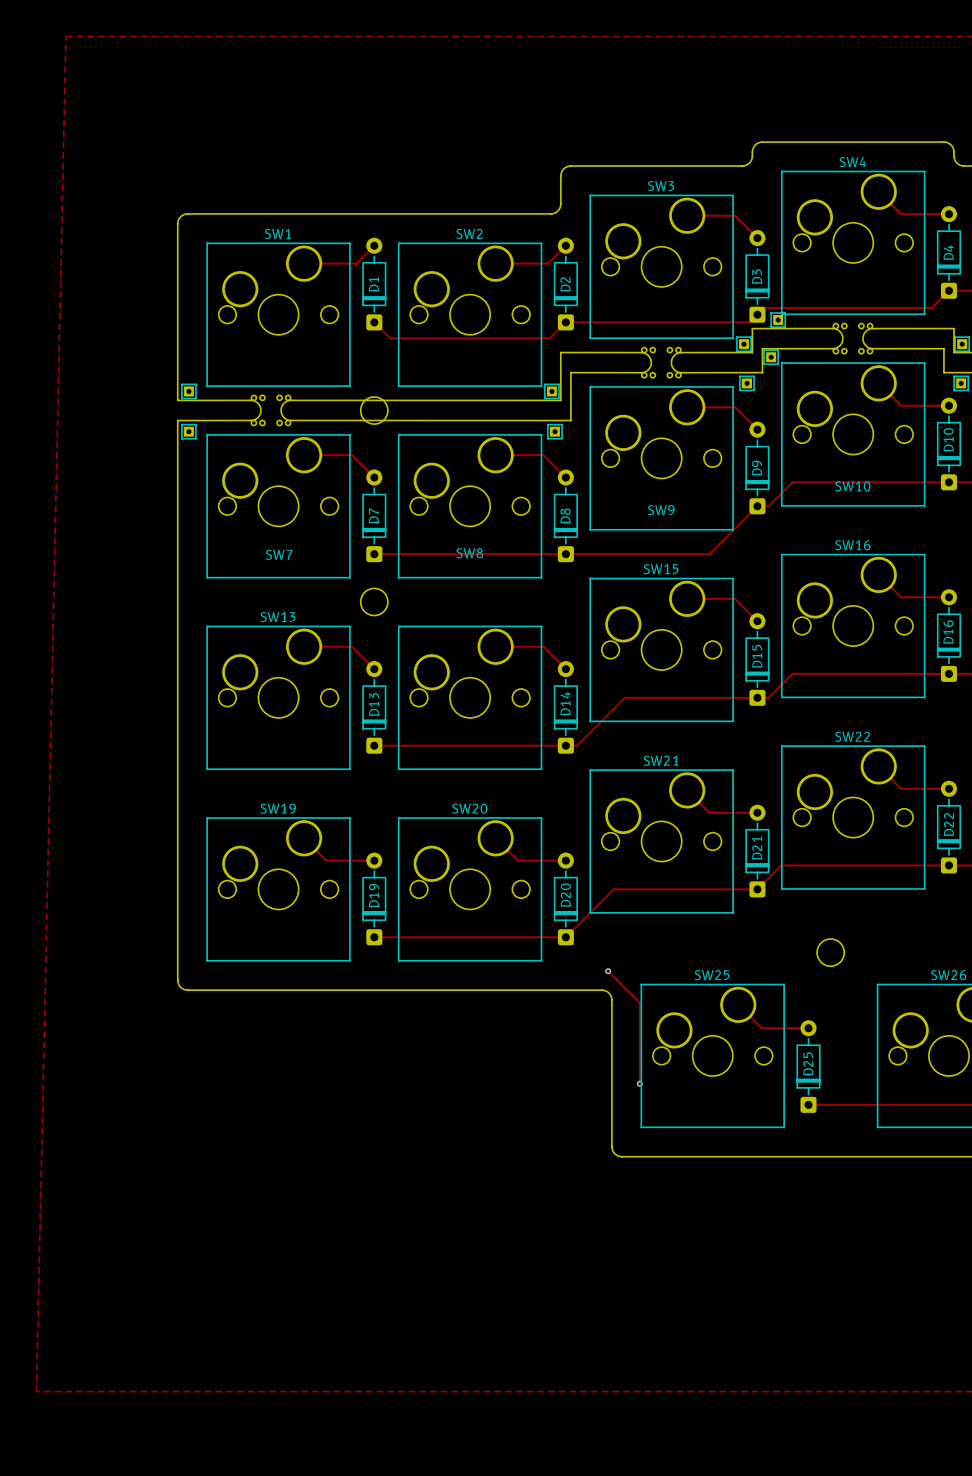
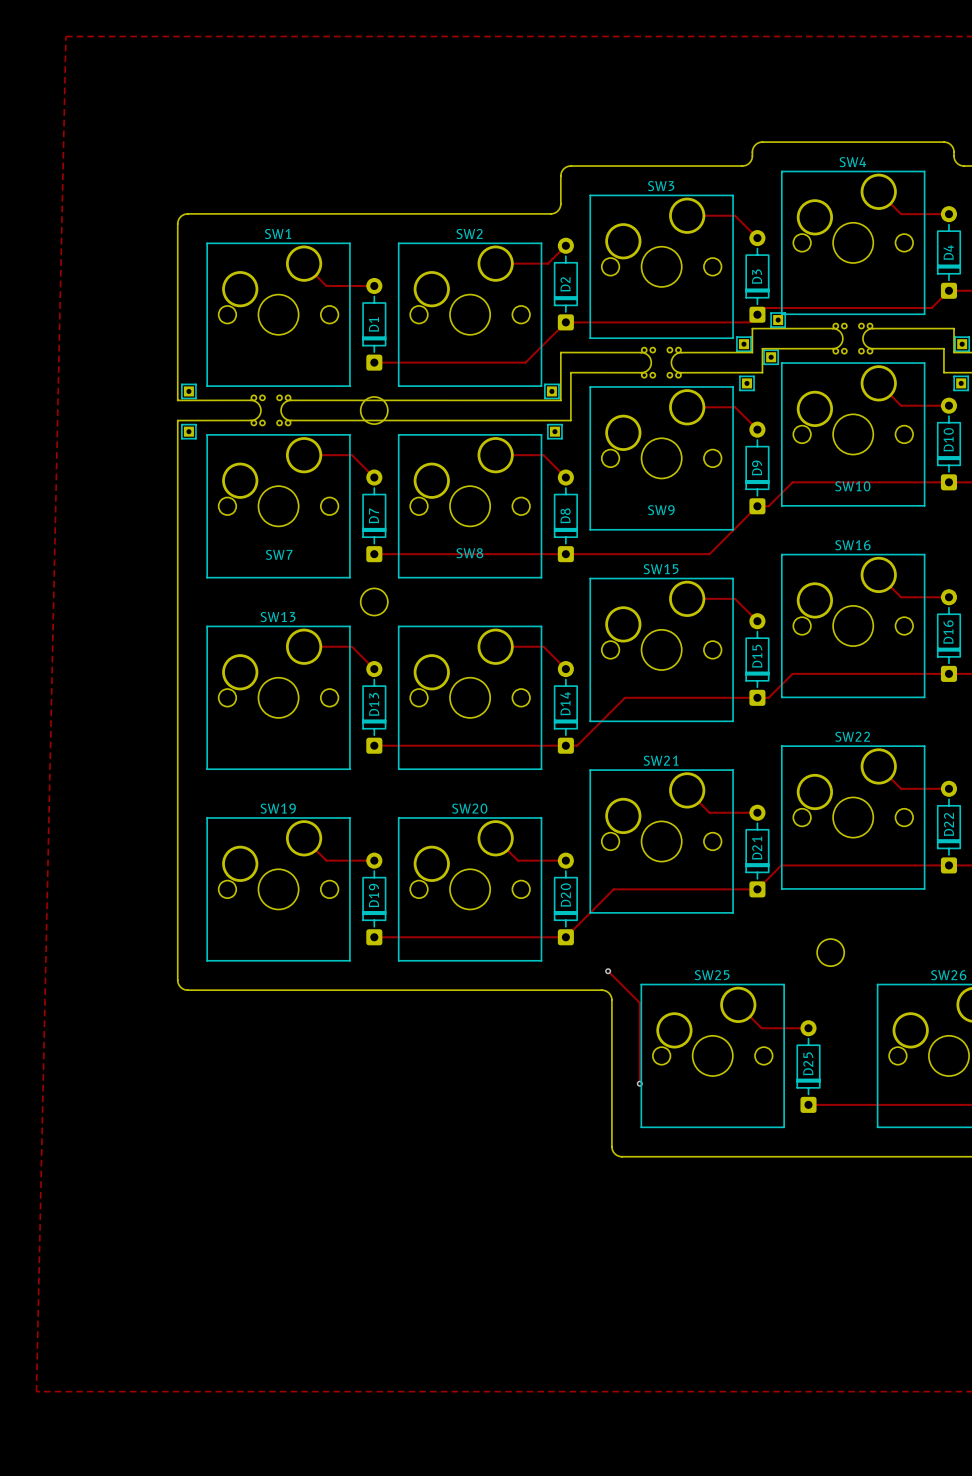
track: (374, 245) (356, 263) (304, 263) -> (374, 285) (326, 285) (304, 263)
D1 position: (374, 284) -> (374, 324)
track: (374, 322) (390, 338) (549, 338) -> (374, 362) (525, 362) (549, 338)

